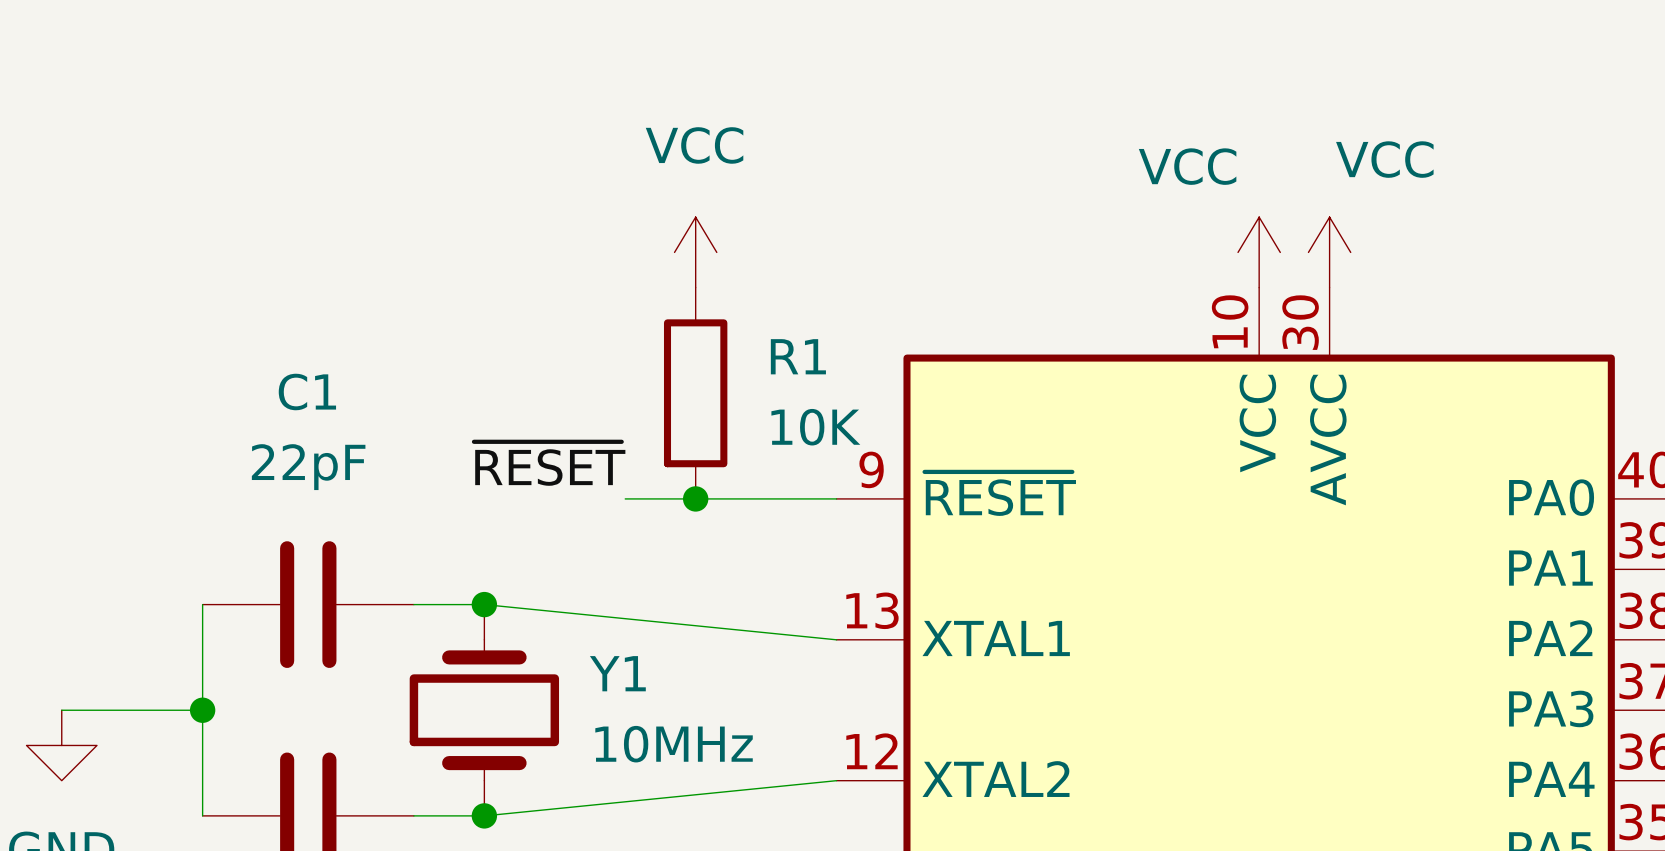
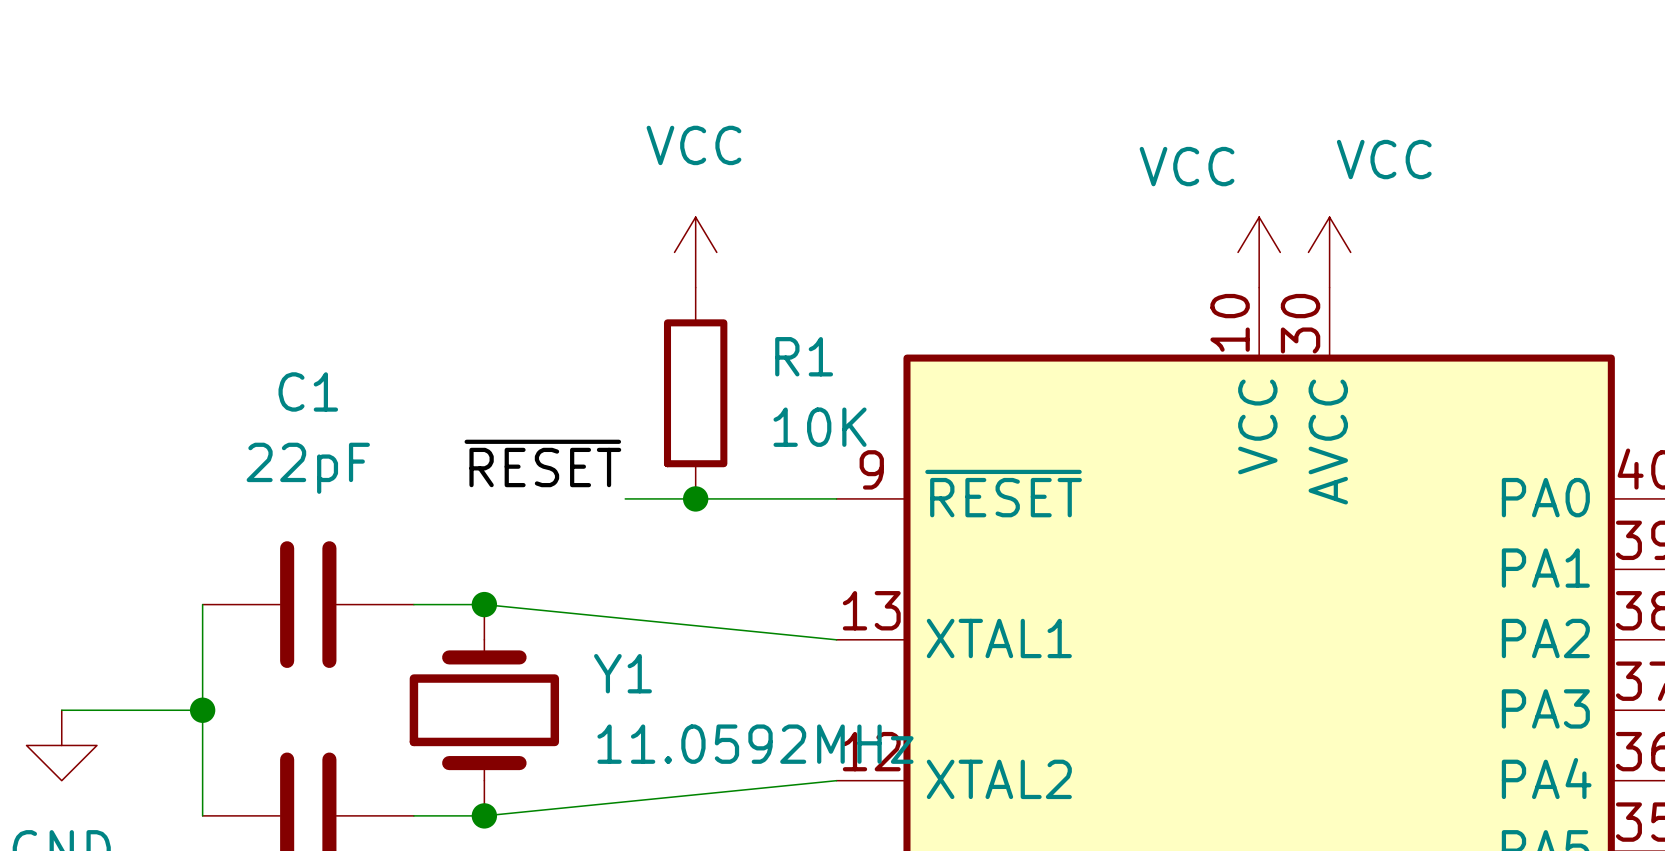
Y1 value: 10MHz (674, 744) -> 11.0592MHz (755, 744)

